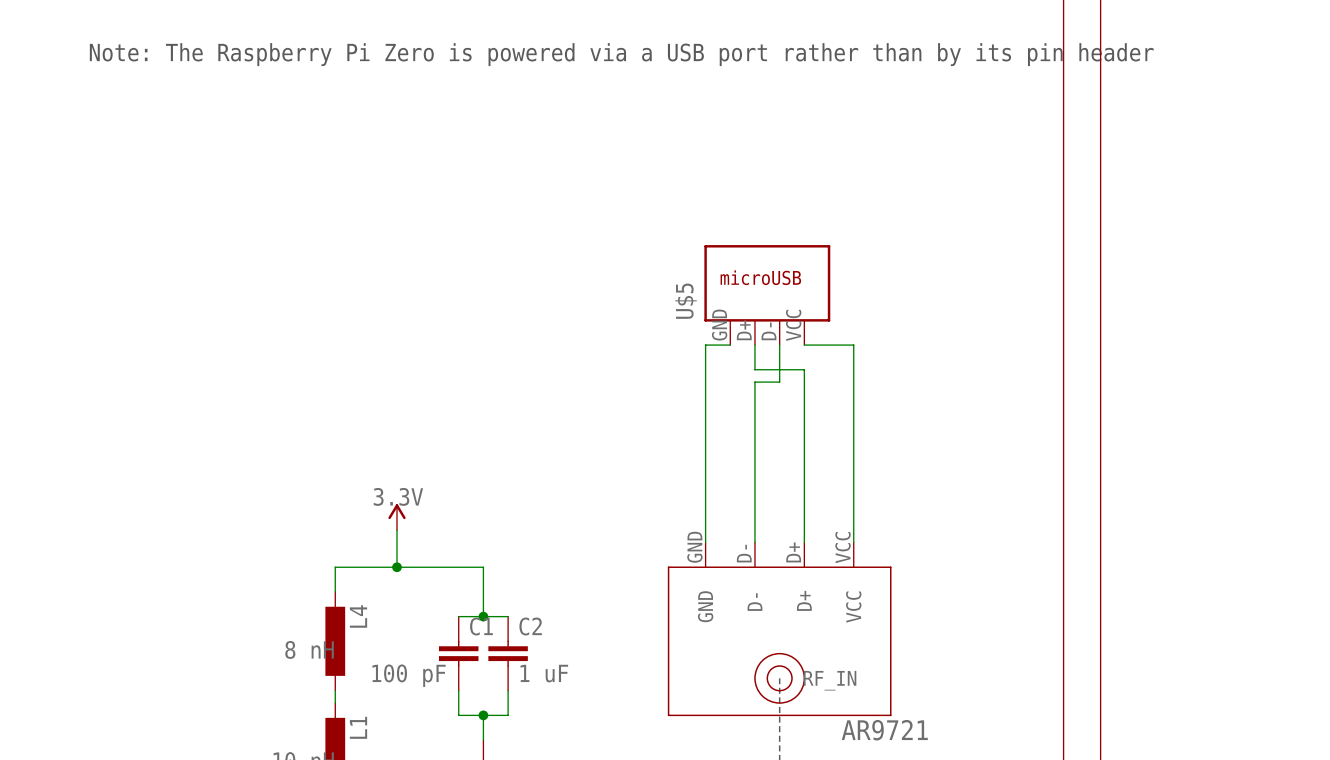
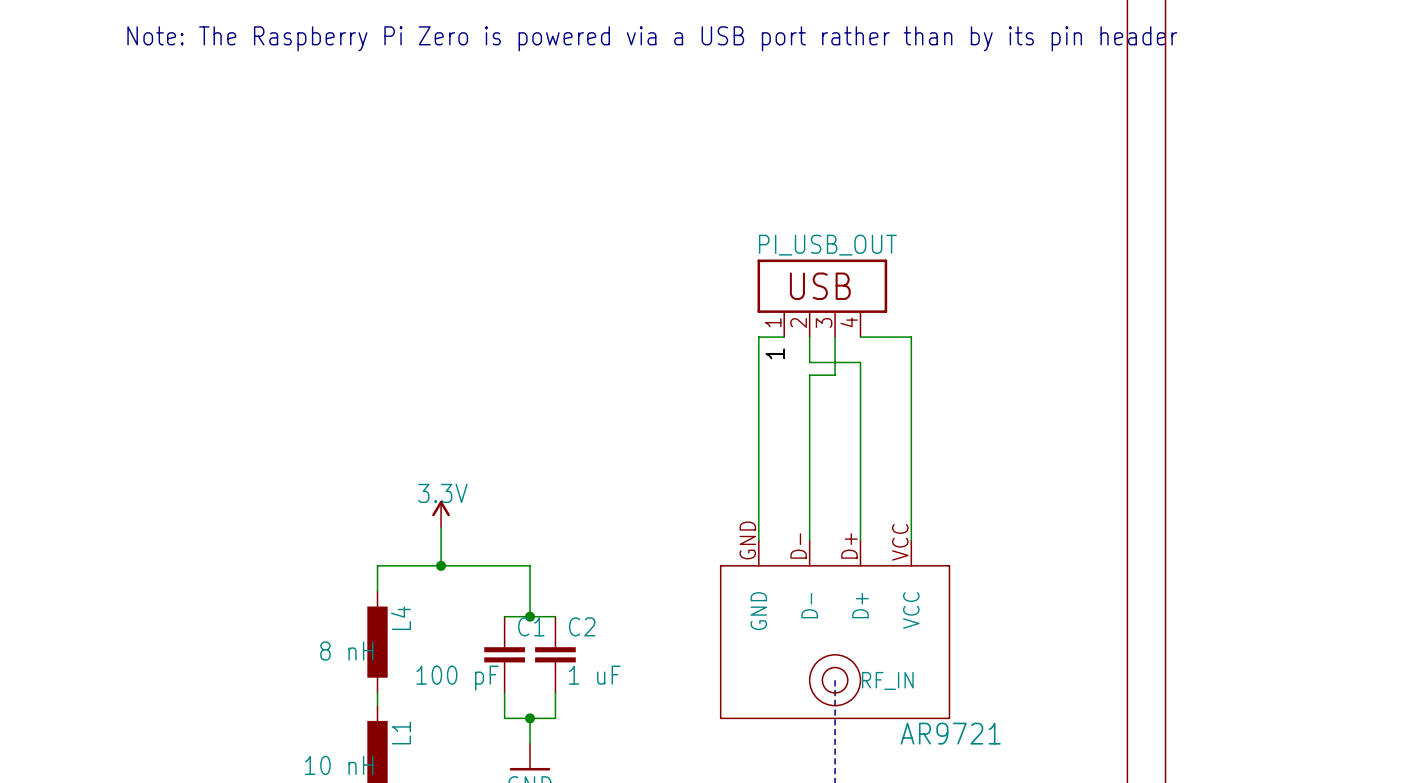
U$5: (767, 295) -> none
PI_USB_OUT: none -> (822, 298)
label: none -> 1 (775, 353)

